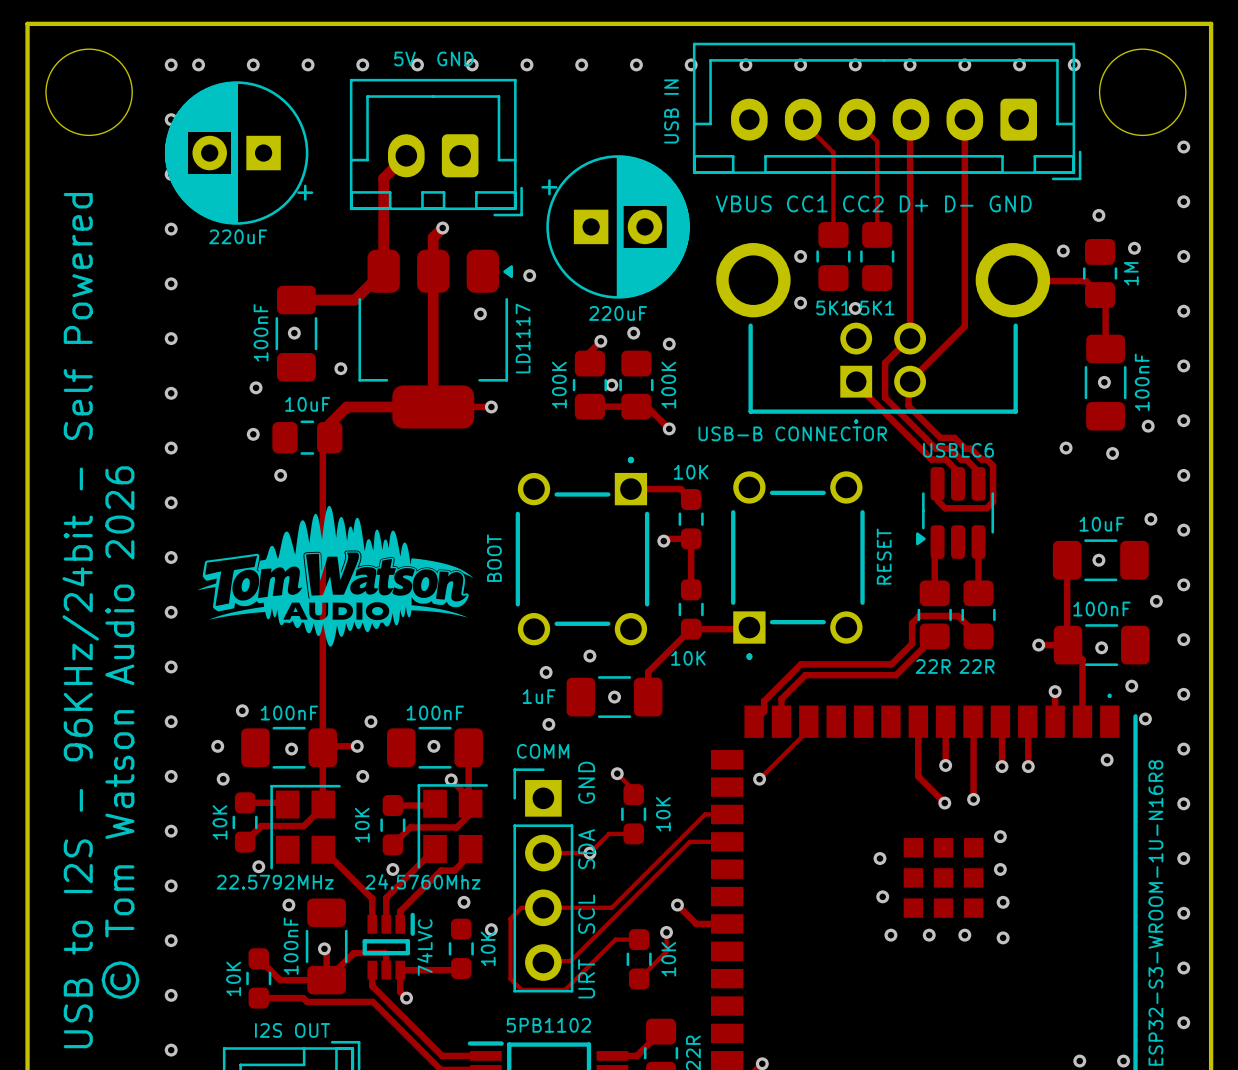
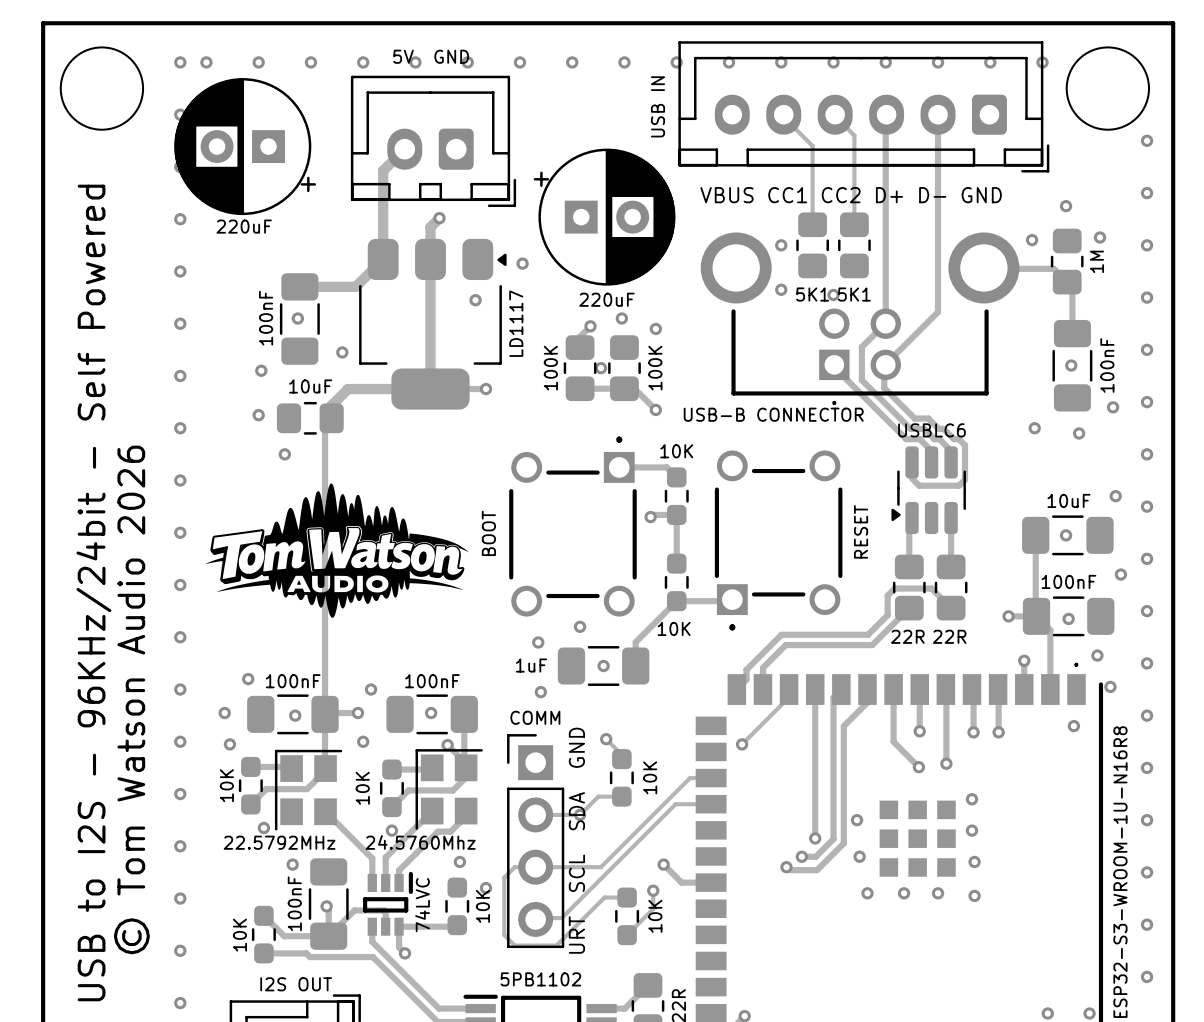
track: none -> (815, 689) (815, 838)
track: none -> (841, 689) (833, 697) (833, 839) (815, 856) (801, 856)
track: none -> (867, 689) (867, 702) (843, 726) (843, 843) (817, 870) (789, 870) (786, 867)
via: none -> (815, 838)
via: none -> (801, 856)
via: none -> (786, 867)

